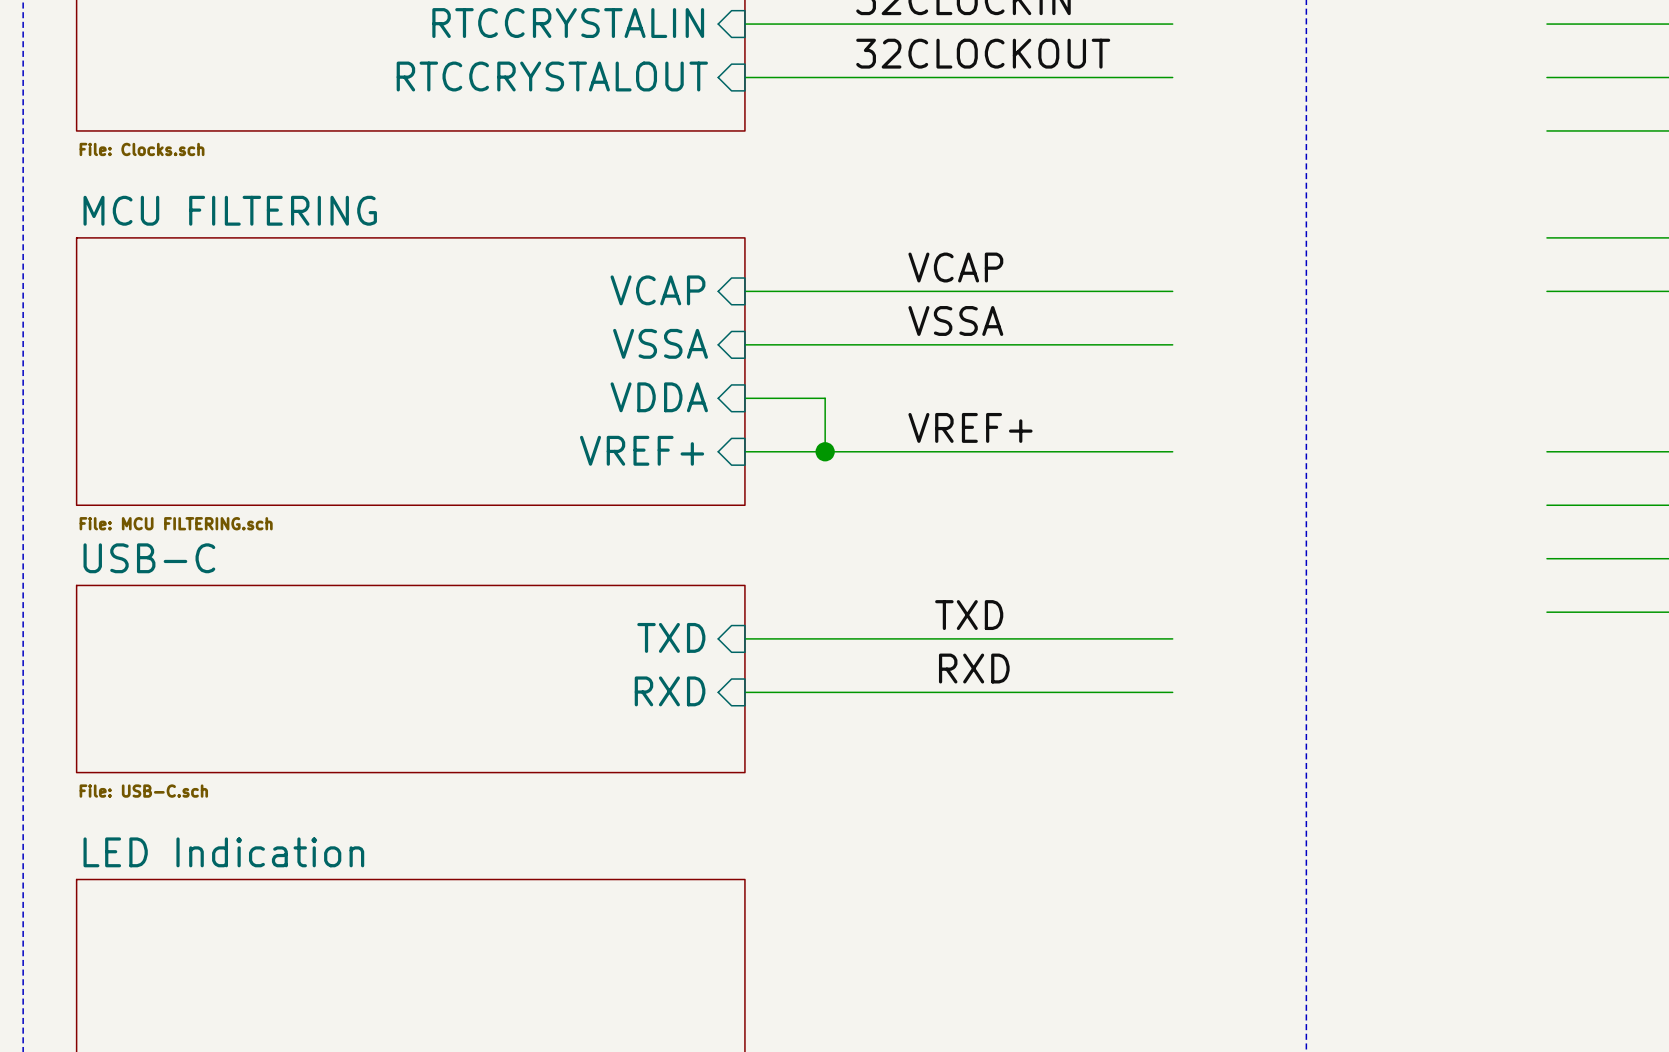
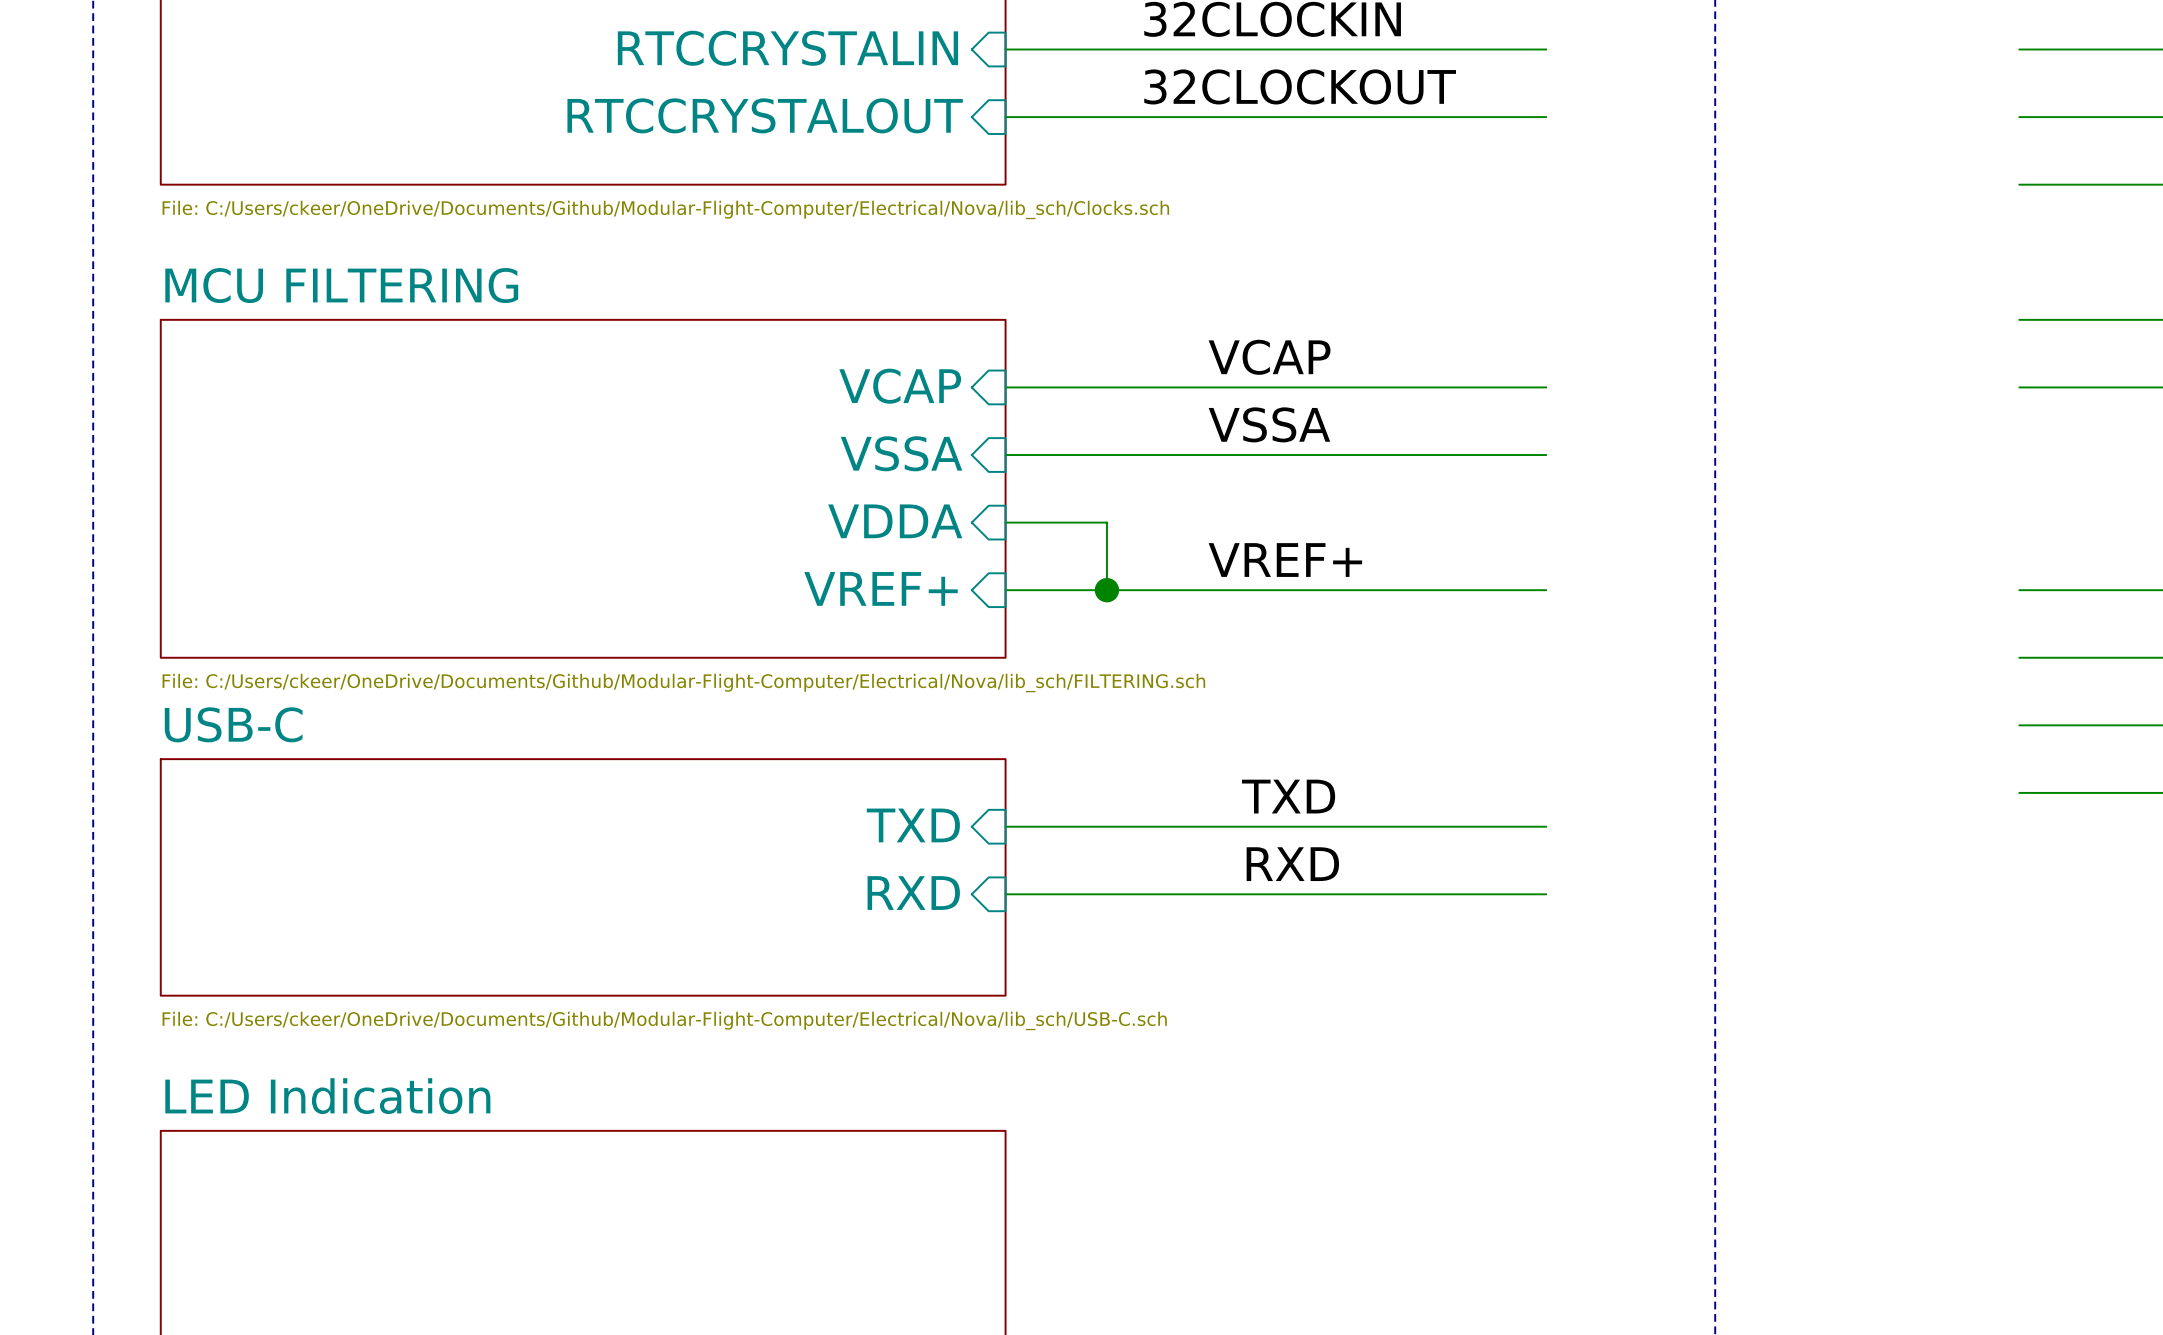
sheet value: File: Clocks.sch (142, 149) -> File: C:/Users/ckeer/OneDrive/Documents/Github/Modular-Flight-Computer/Electrical/Nova/lib_sch/Clocks.sch (665, 209)
sheet MCU FILTERING value: File: MCU FILTERING.sch (176, 523) -> File: C:/Users/ckeer/OneDrive/Documents/Github/Modular-Flight-Computer/Electrical/Nova/lib_sch/FILTERING.sch (683, 683)
sheet USB-C value: File: USB-C.sch (143, 791) -> File: C:/Users/ckeer/OneDrive/Documents/Github/Modular-Flight-Computer/Electrical/Nova/lib_sch/USB-C.sch (664, 1020)

